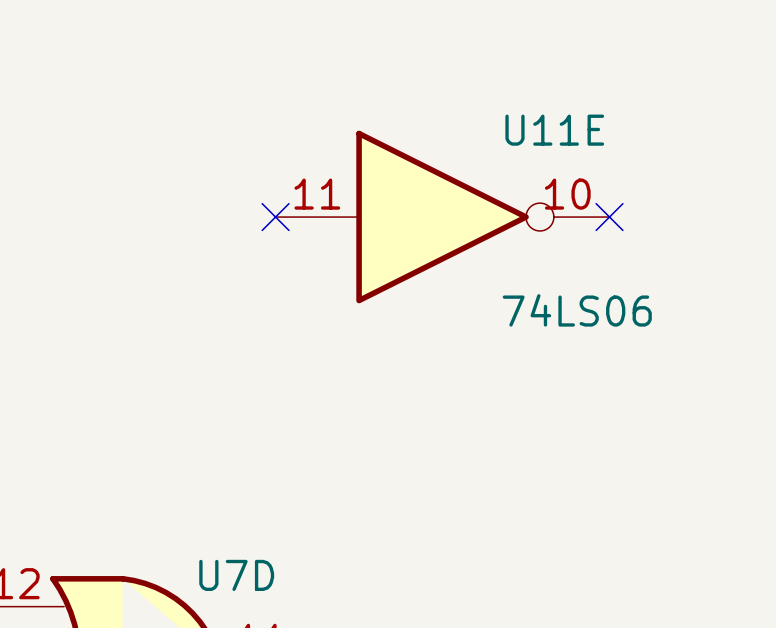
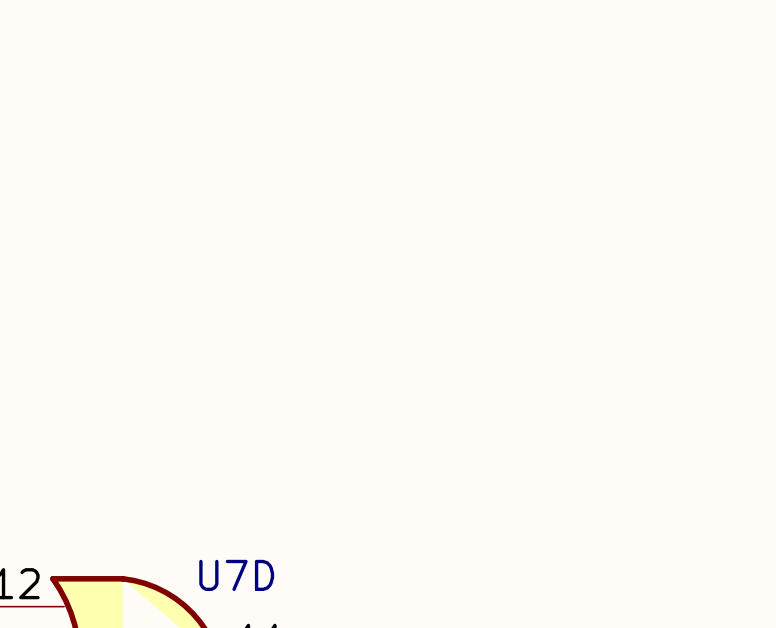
no-connect mark: (275, 217) -> none
U11E: 74LS06 (442, 217) -> none
no-connect mark: (609, 217) -> none

